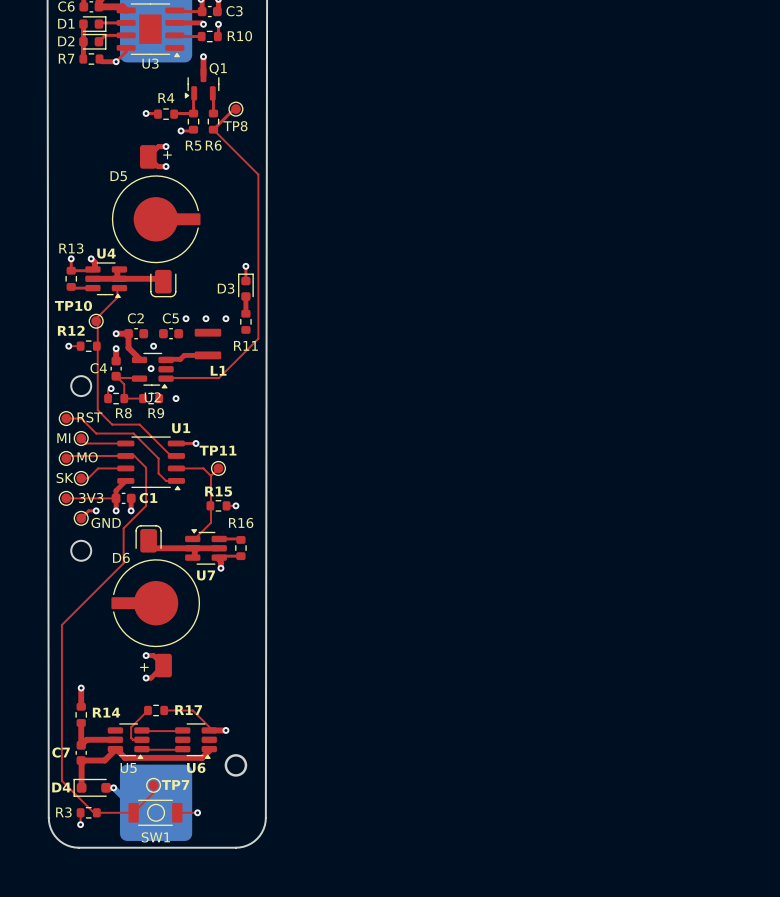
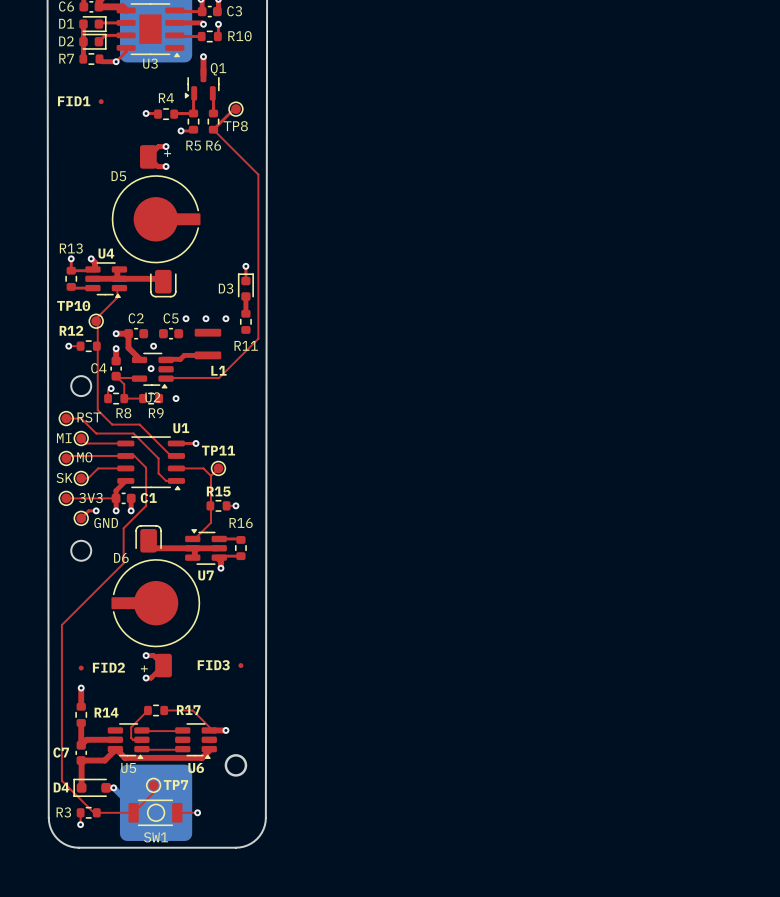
FID1: none -> (101, 101)
FID3: none -> (240, 665)
FID2: none -> (81, 668)

